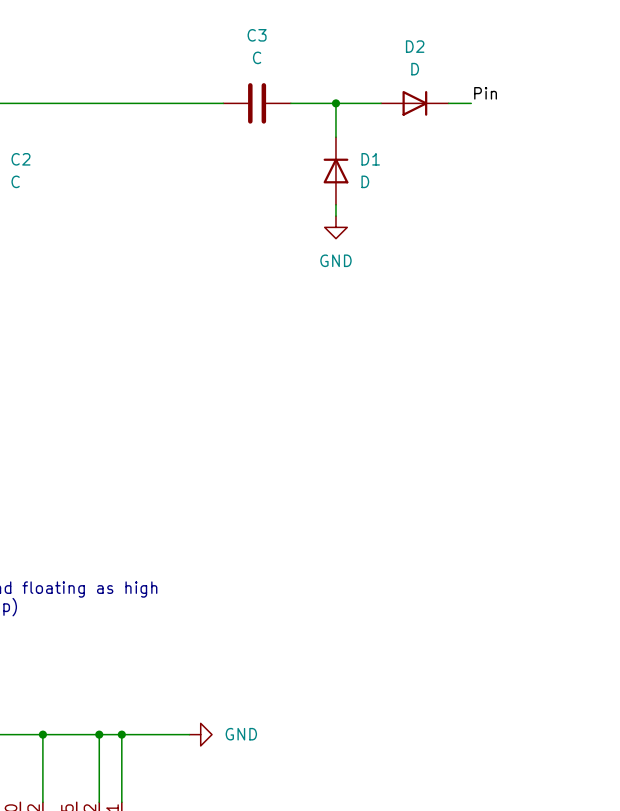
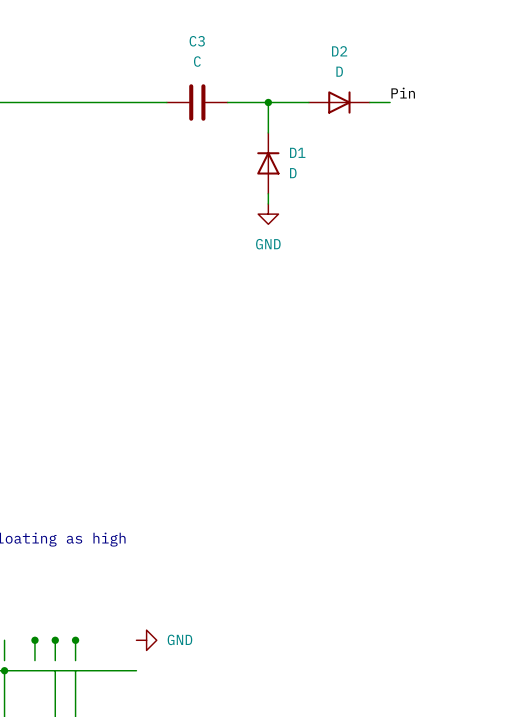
wire: none -> (4, 640) (4, 660)
wire: none -> (34, 640) (34, 660)
junction: none -> (34, 640)
wire: none -> (55, 640) (55, 660)
junction: none -> (55, 640)
wire: none -> (75, 640) (75, 660)
junction: none -> (75, 640)
junction: (99, 734) -> none
junction: (121, 734) -> none
power symbol position: GND (200, 734) -> GND (146, 640)

